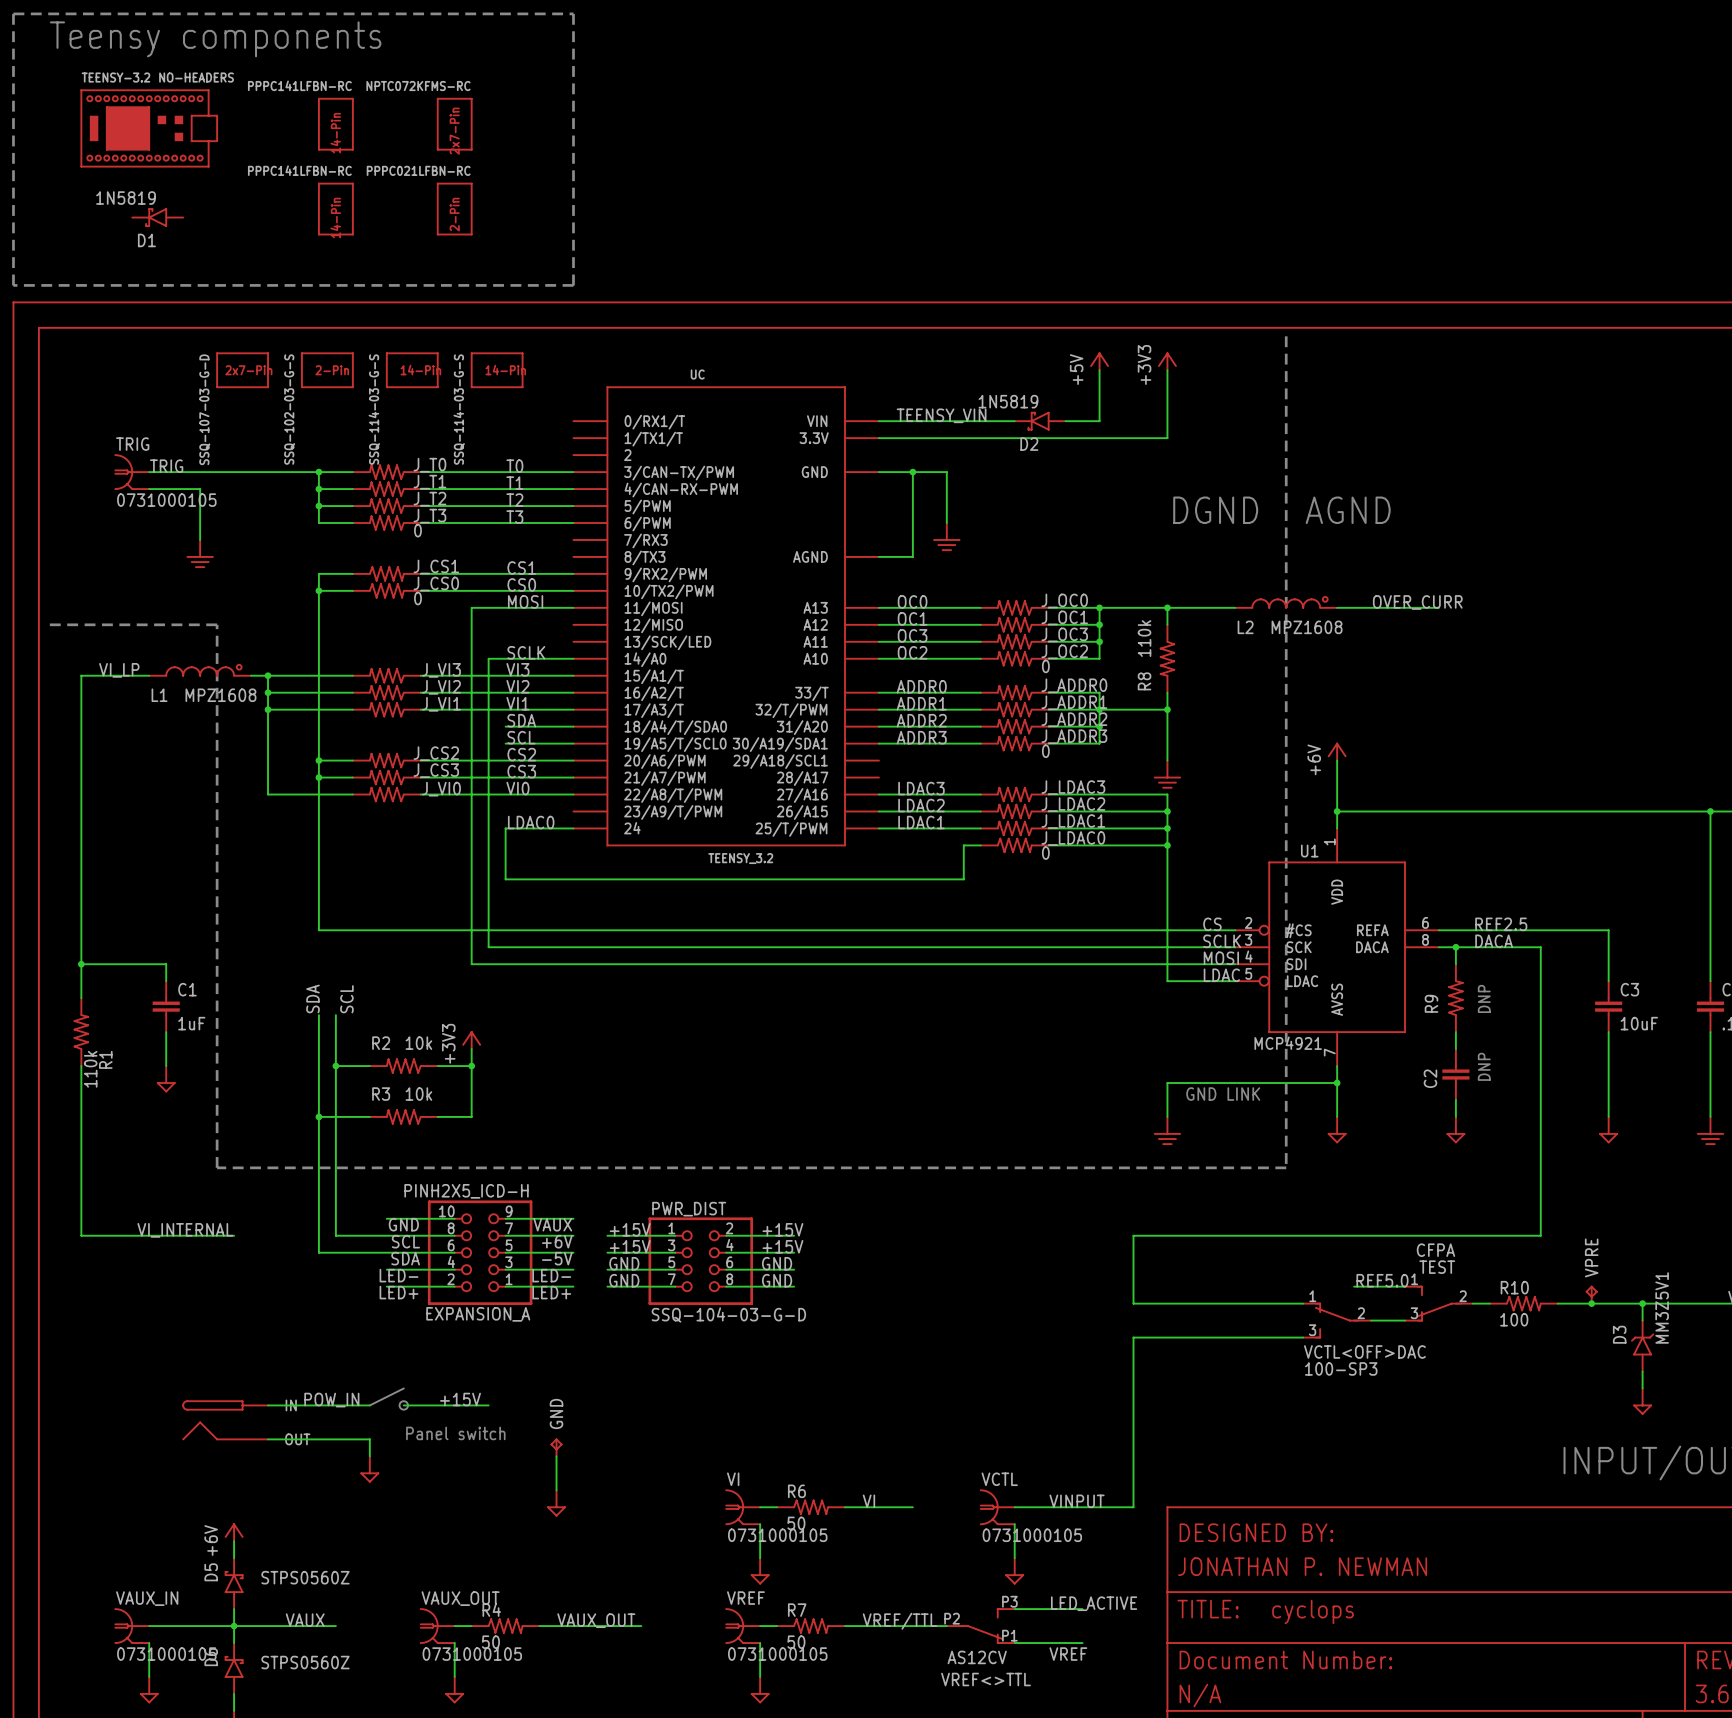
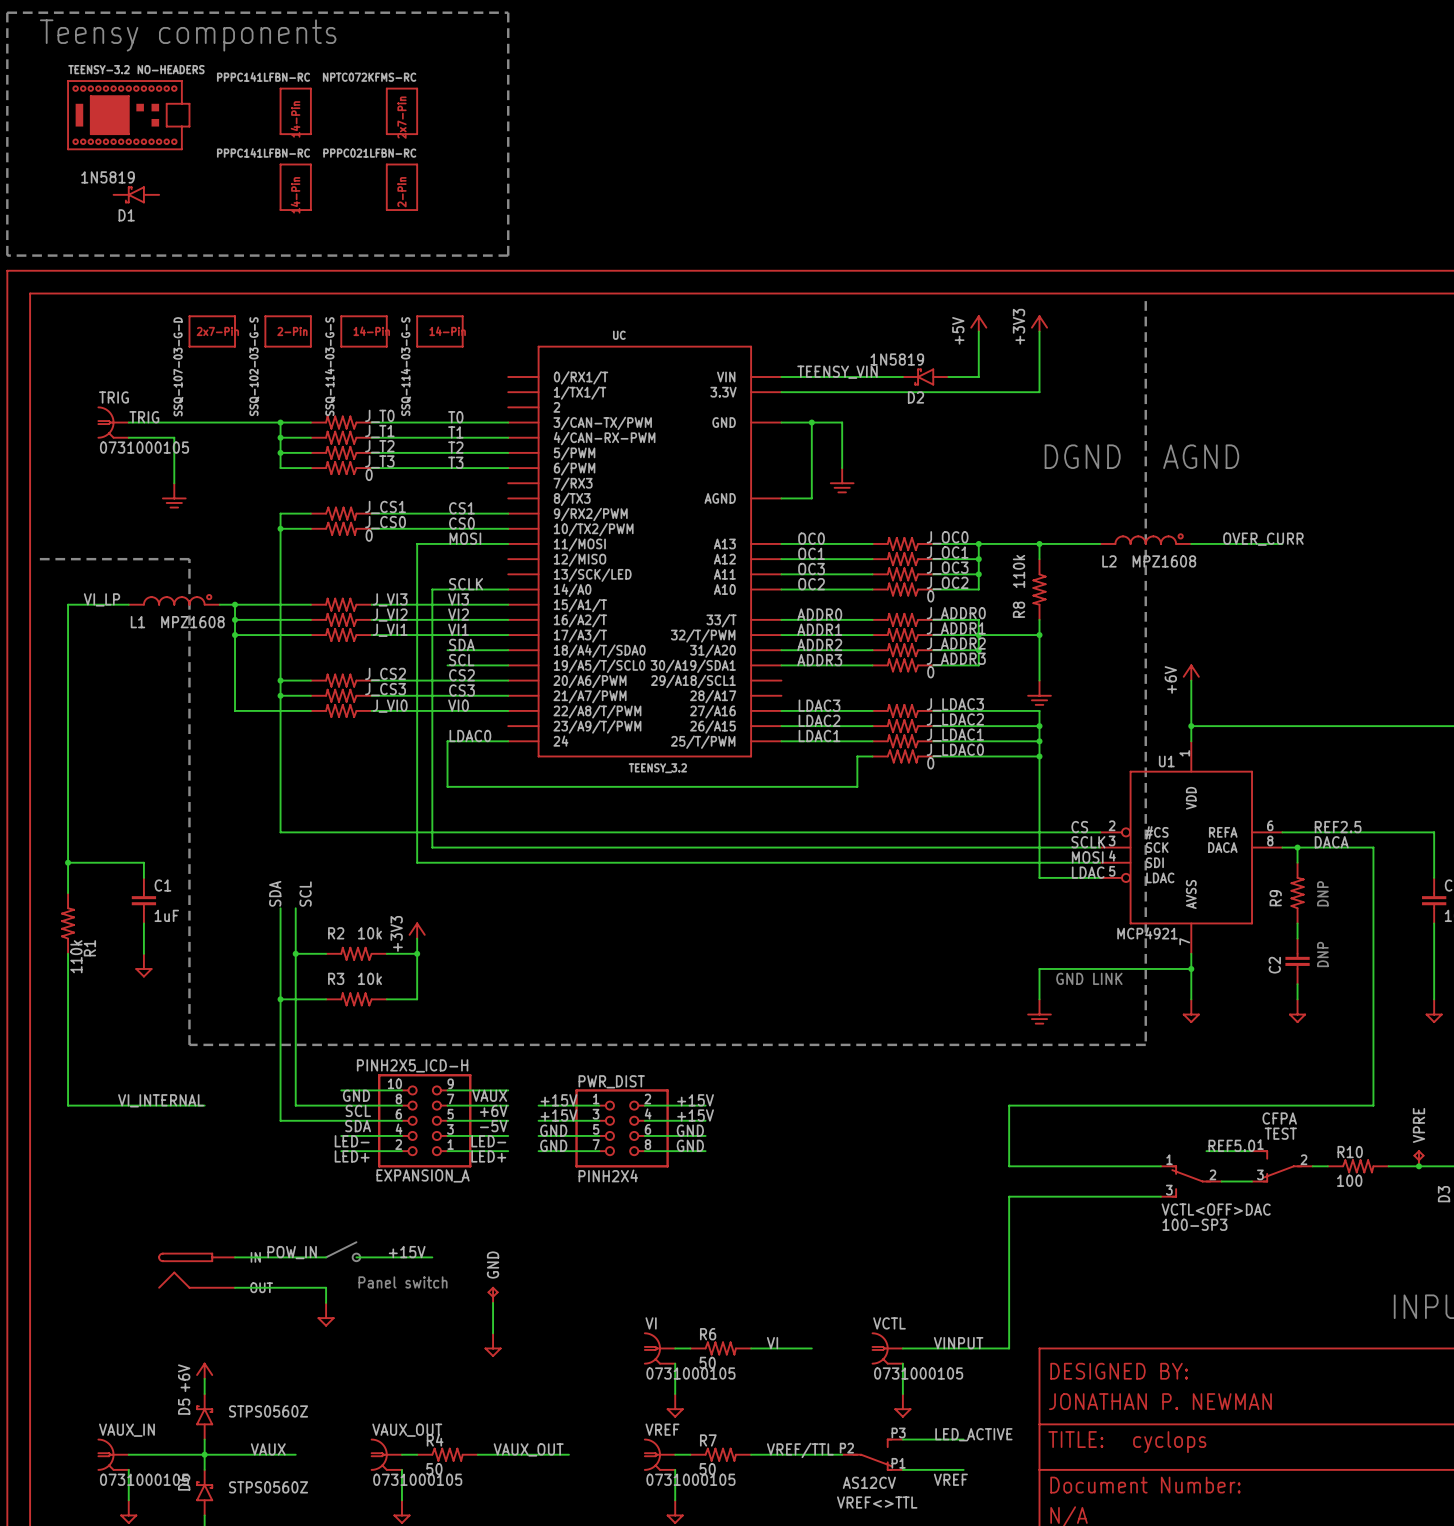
PWR_DIST value: SSQ-104-03-G-D (728, 1314) -> PINH2X4 (608, 1175)

